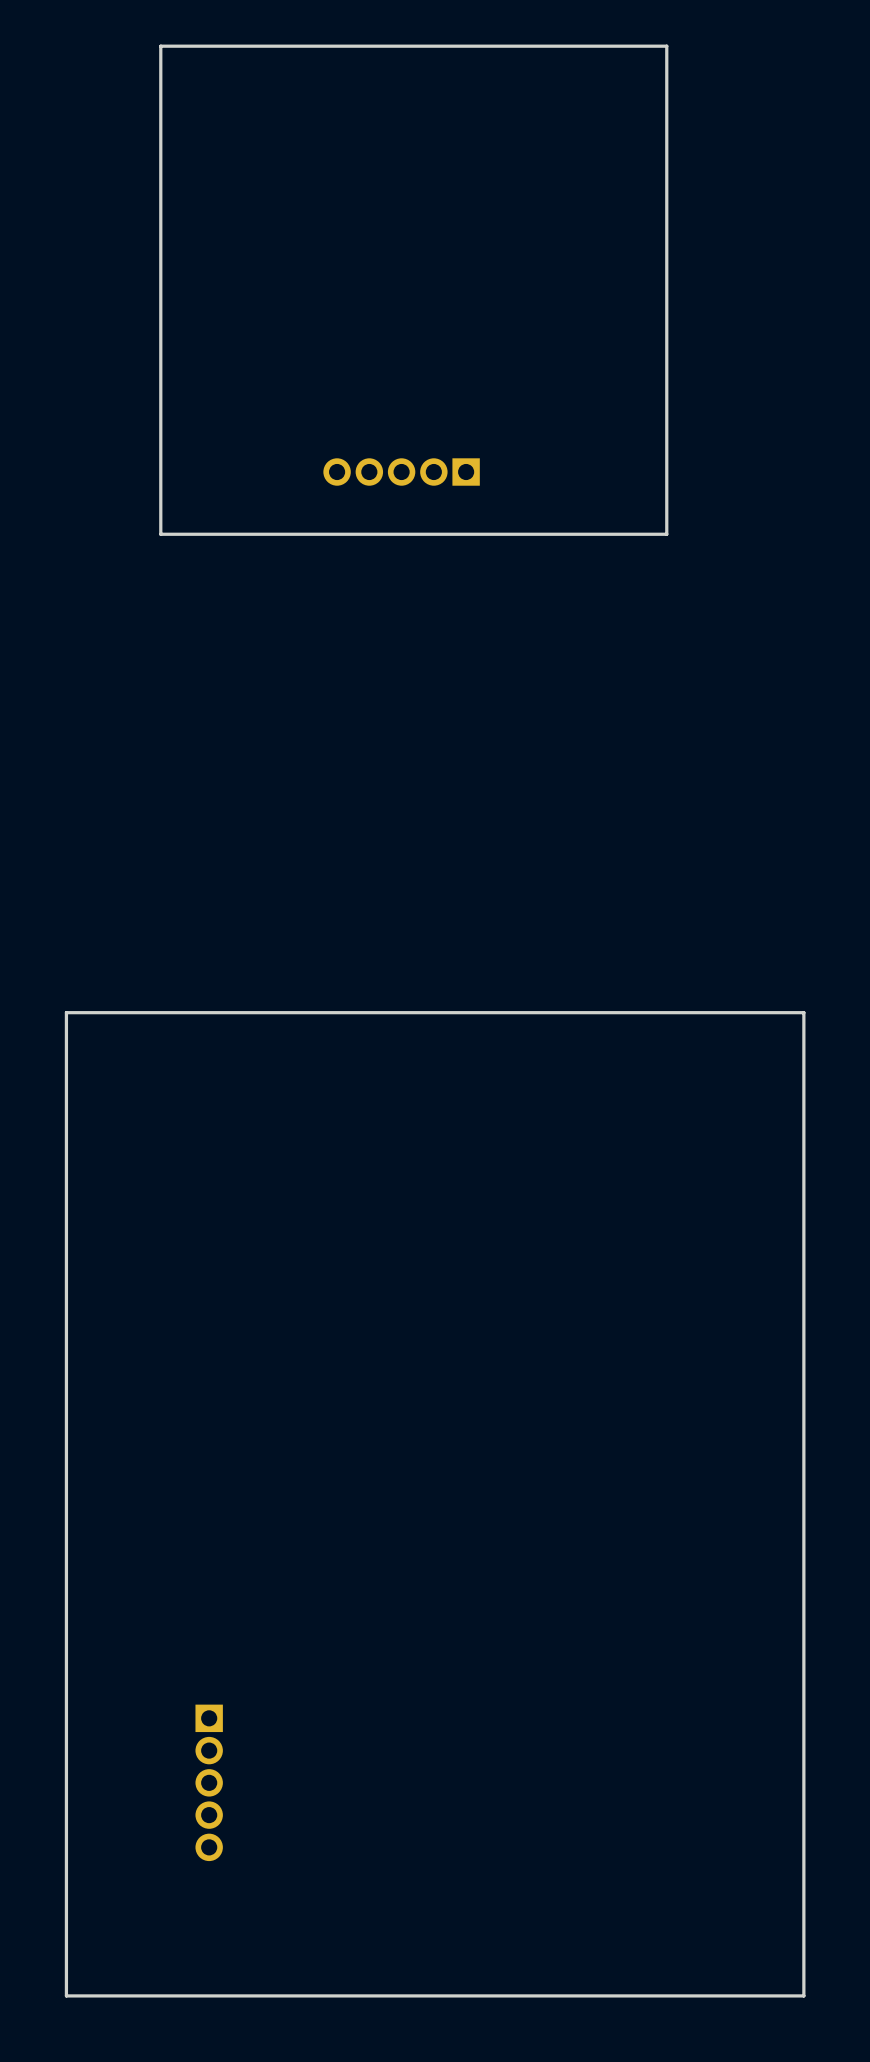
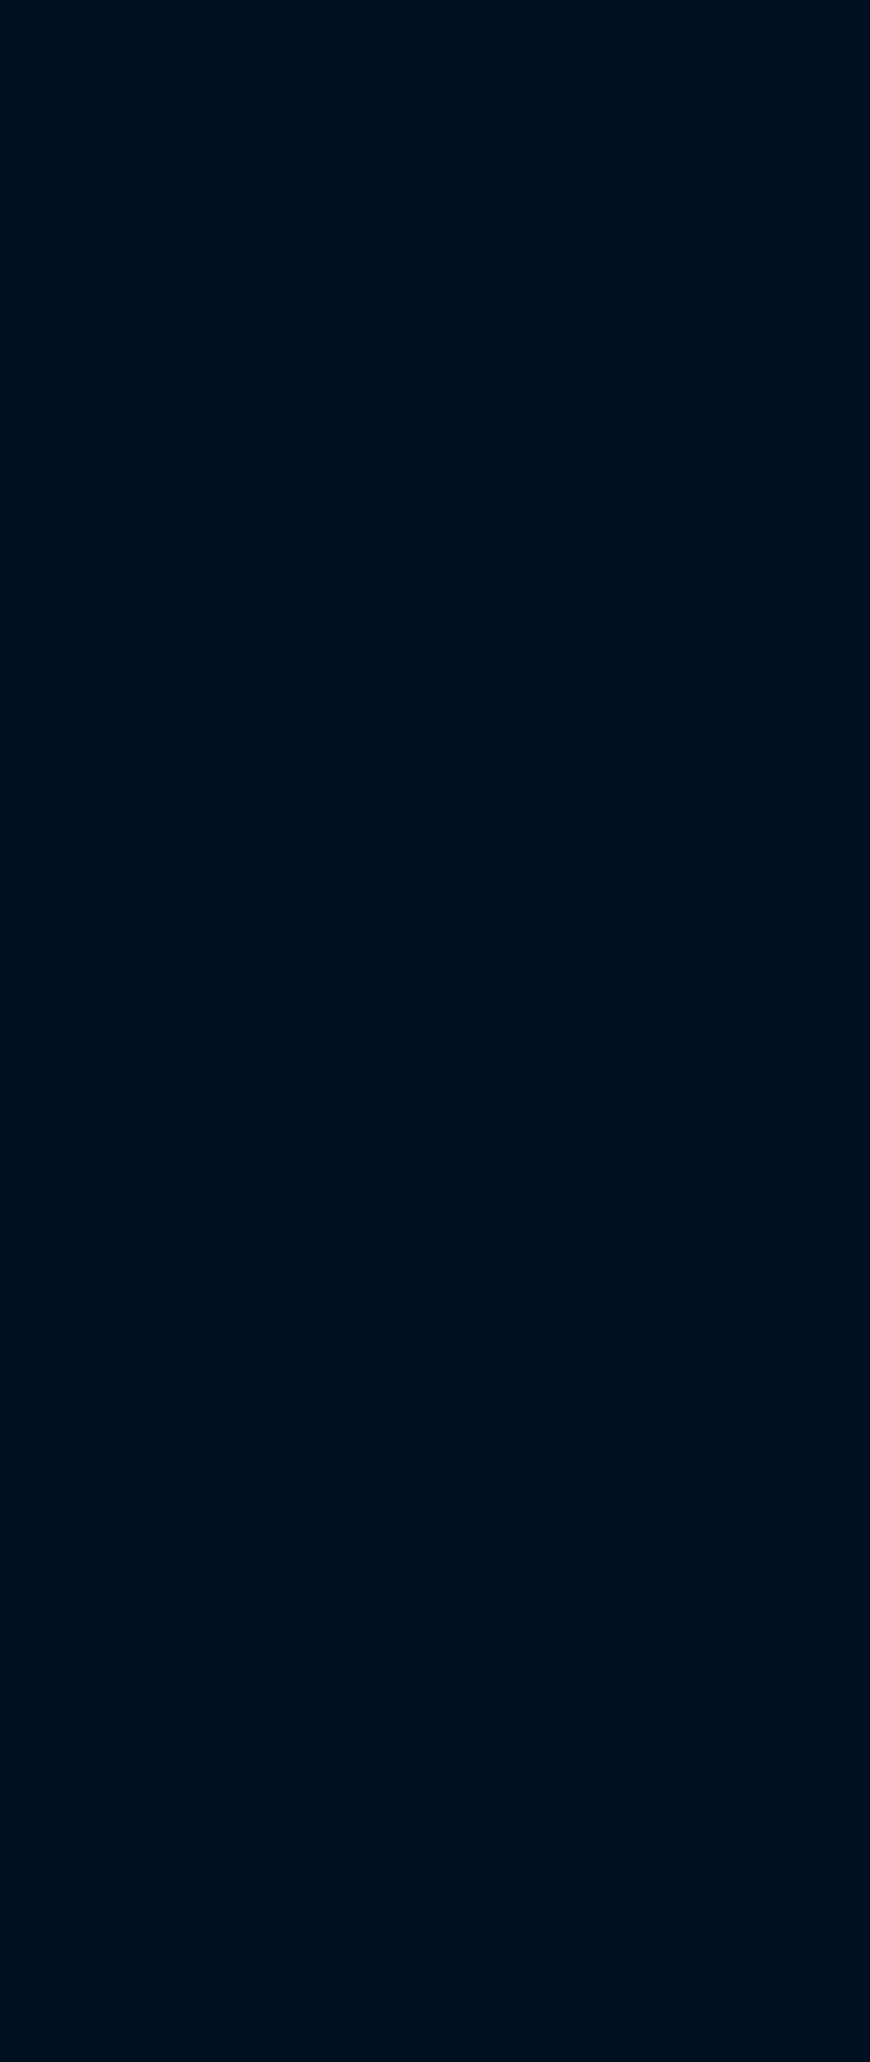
board edge: (666, 46) (160, 46) (160, 534) (666, 534) (666, 46) -> none
part: (401, 472) -> none
board edge: (803, 1012) (66, 1012) (66, 1995) (803, 1995) (803, 1012) -> none
part: (209, 1782) -> none

